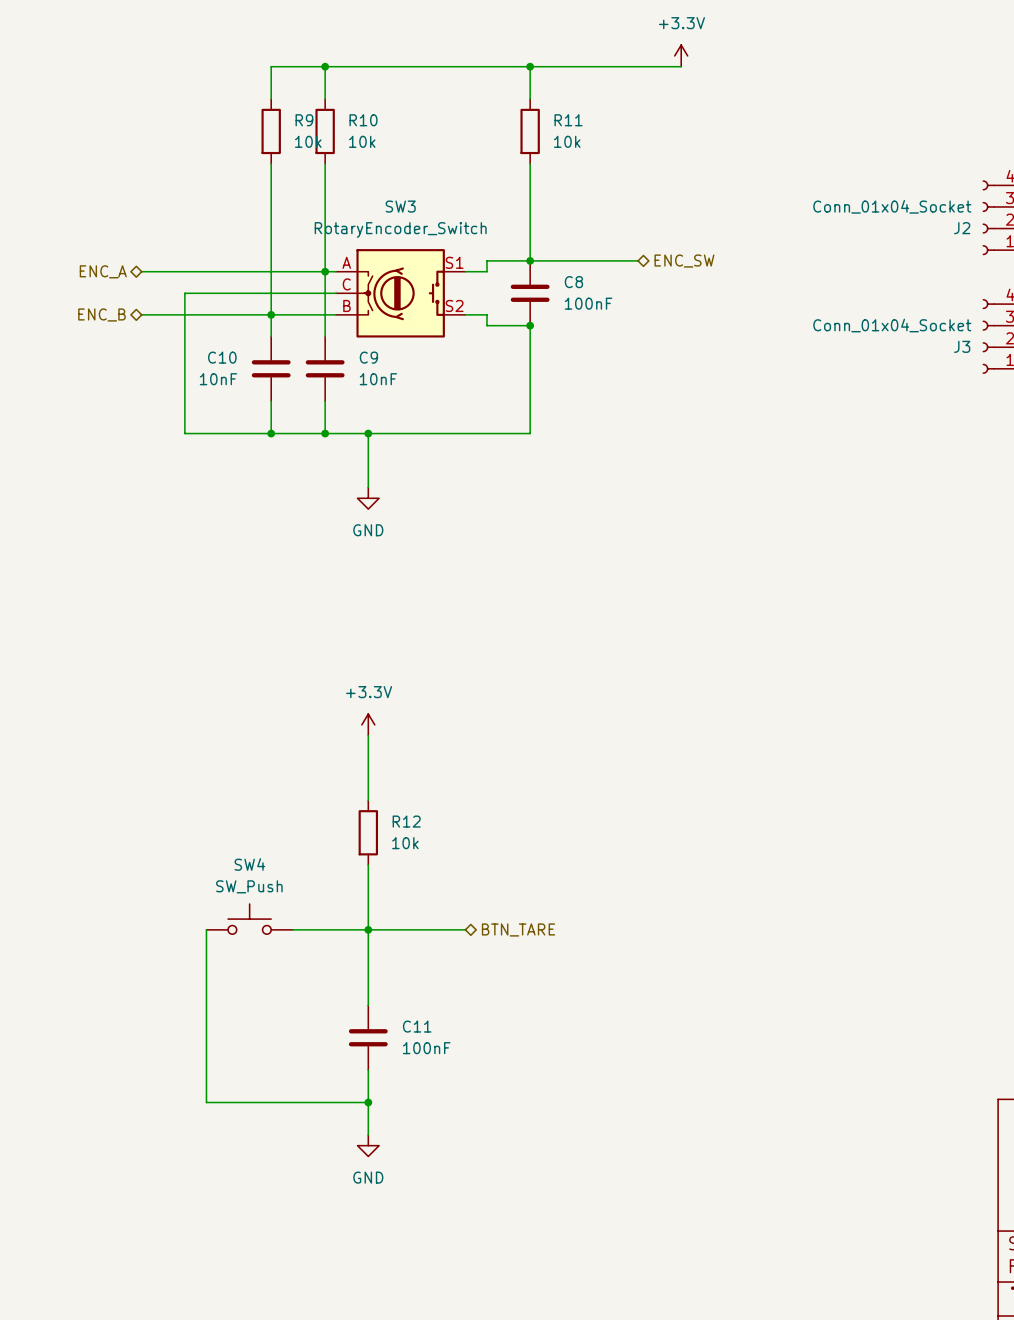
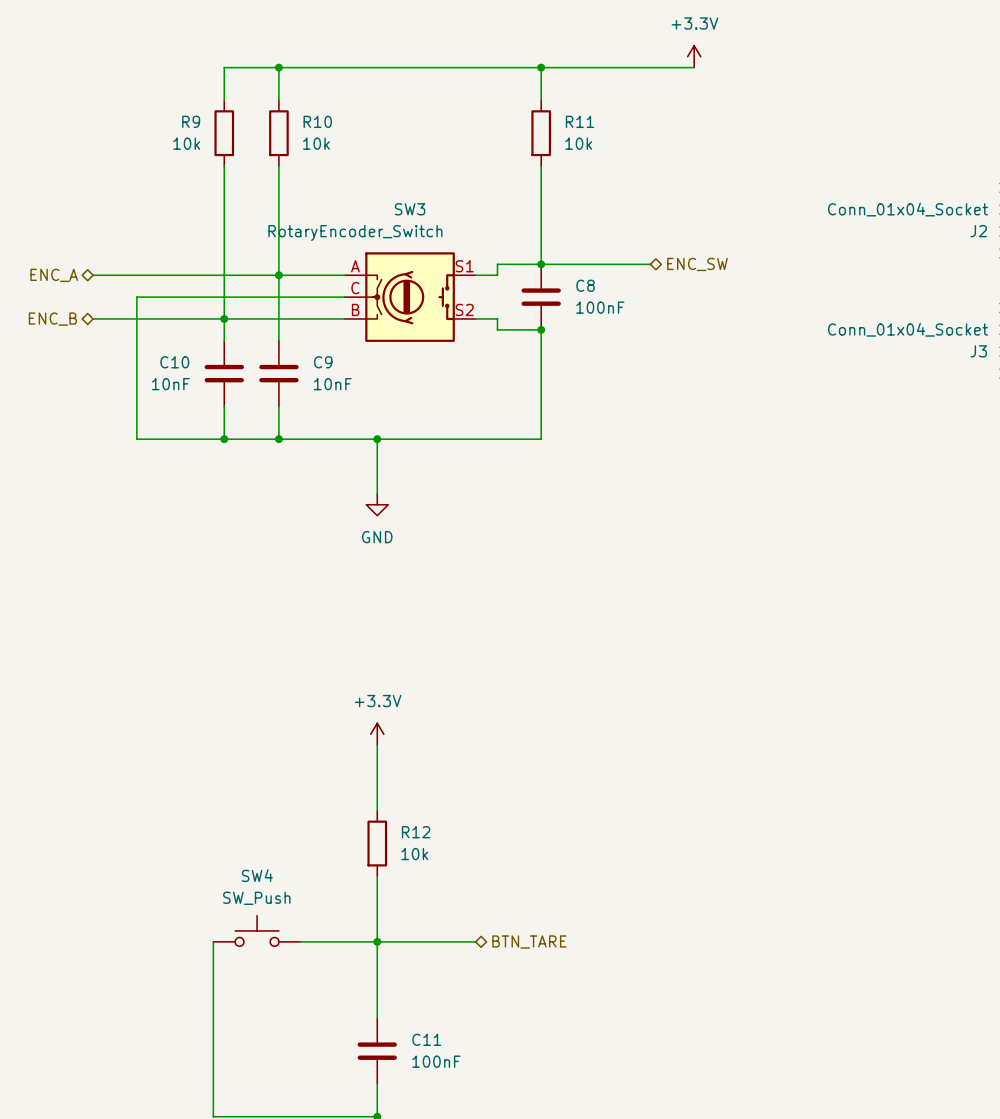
wire: none -> (278, 67) (224, 67) (224, 100)
junction: none -> (278, 67)
wire: (325, 66) (325, 99) -> none
junction: (325, 66) -> none
R9 name: R9 (304, 120) -> R10 (317, 121)
R9: none -> 10k (224, 133)
R10: 10k (325, 131) -> none
wire: (325, 163) (325, 336) -> (224, 165) (224, 340)
SW3 value position: RotaryEncoder_Switch (400, 229) -> RotaryEncoder_Switch (355, 232)
wire: none -> (93, 275) (147, 275)
hierarchical label position: ENC_A (103, 271) -> ENC_A (54, 275)
junction: none -> (278, 275)
junction: (325, 271) -> none
wire: (184, 293) (184, 433) -> (191, 297) (136, 297) (136, 439) (191, 439)
wire: none -> (93, 318) (147, 318)
hierarchical label position: ENC_B (102, 314) -> ENC_B (52, 319)
junction: none -> (224, 318)
junction: (271, 314) -> none
C10 name: C10 (222, 357) -> C9 (323, 362)
C10: none -> 10nF (224, 373)
C9: 10nF (325, 368) -> none
C10 value position: 10nF (218, 379) -> 10nF (332, 384)
wire: (325, 401) (325, 433) -> (224, 406) (224, 439)
junction: none -> (224, 439)
junction: (325, 433) -> none

